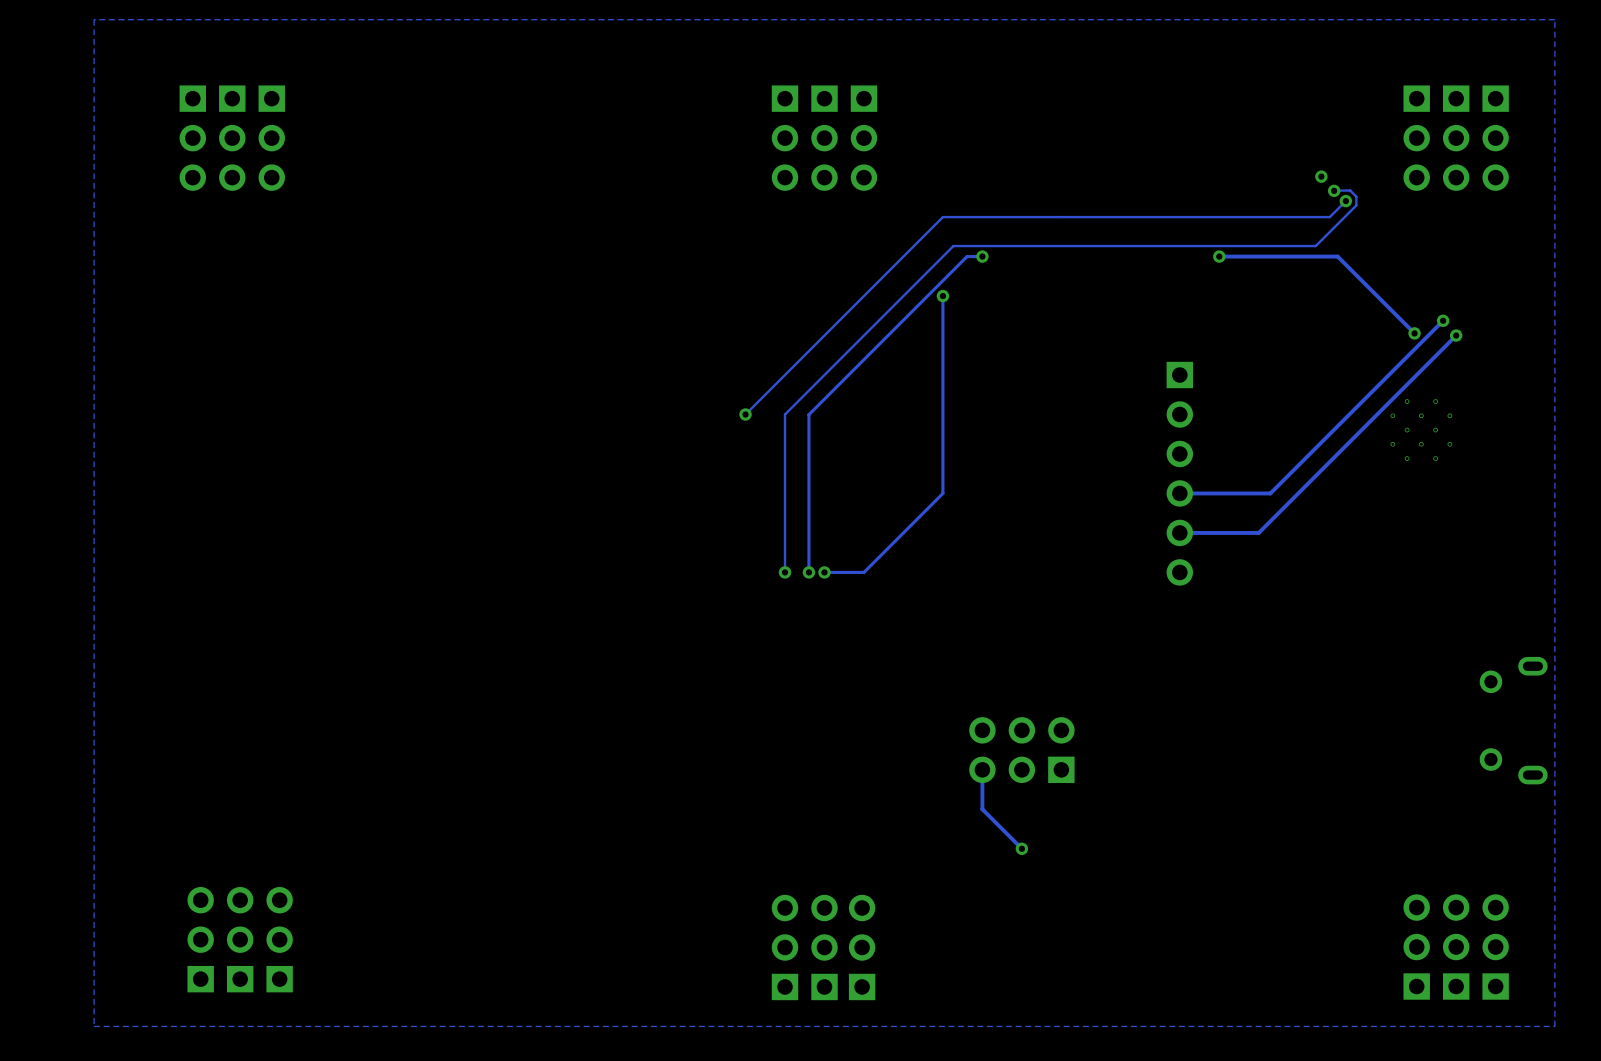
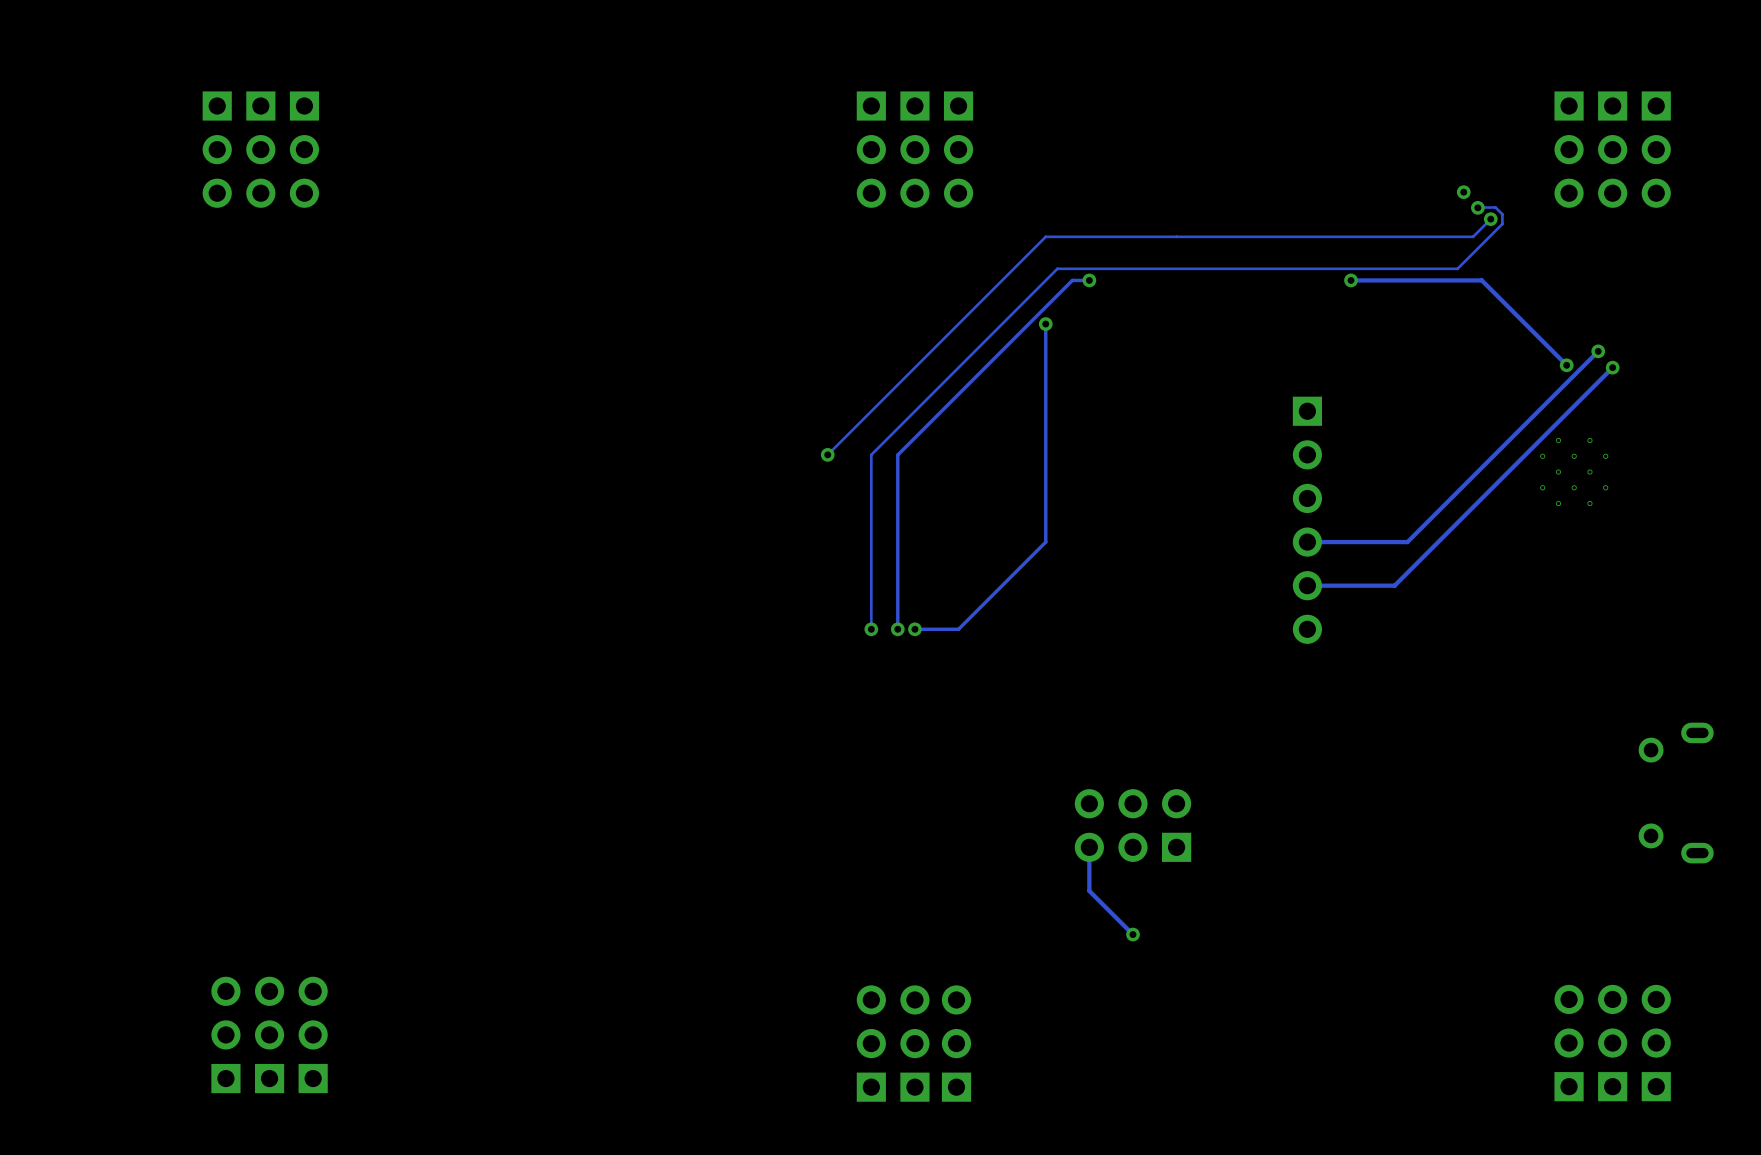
zone outline: (1554, 19) (1554, 1026) (94, 1026) (94, 19) (1554, 19) -> none

